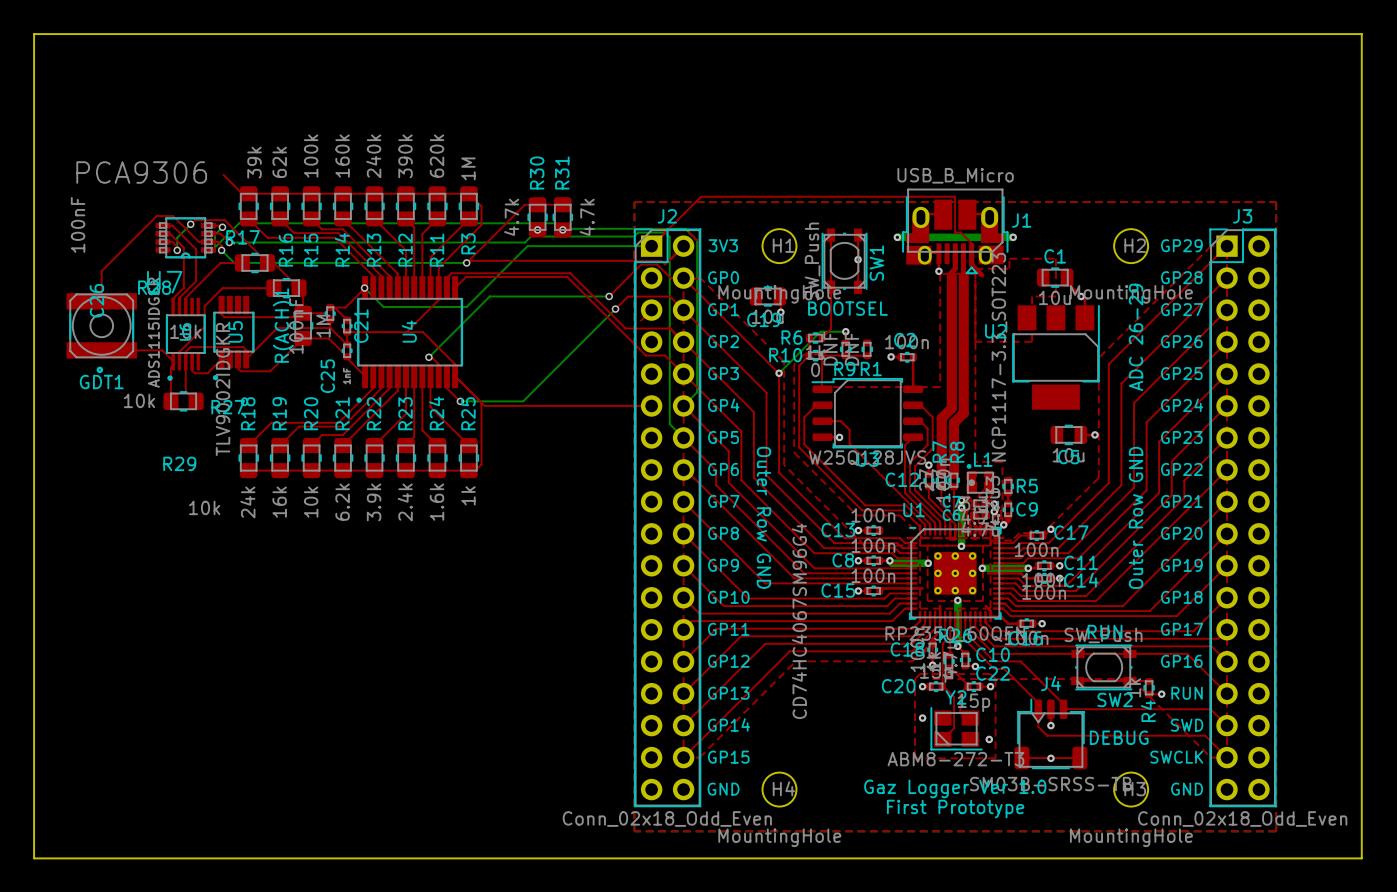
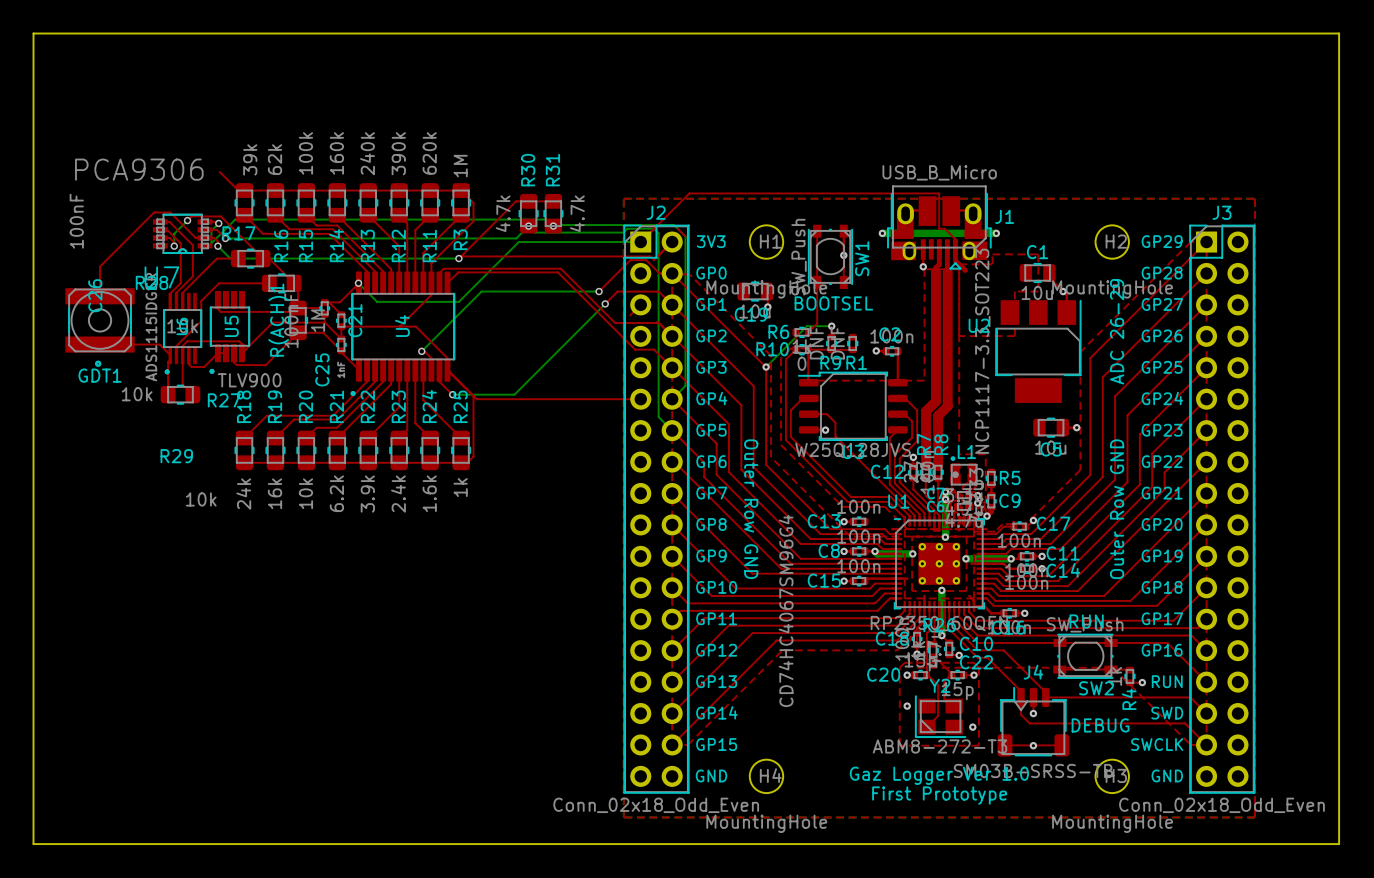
U5 value: TLV9002IDGKR (223, 389) -> TLV900 (249, 380)

